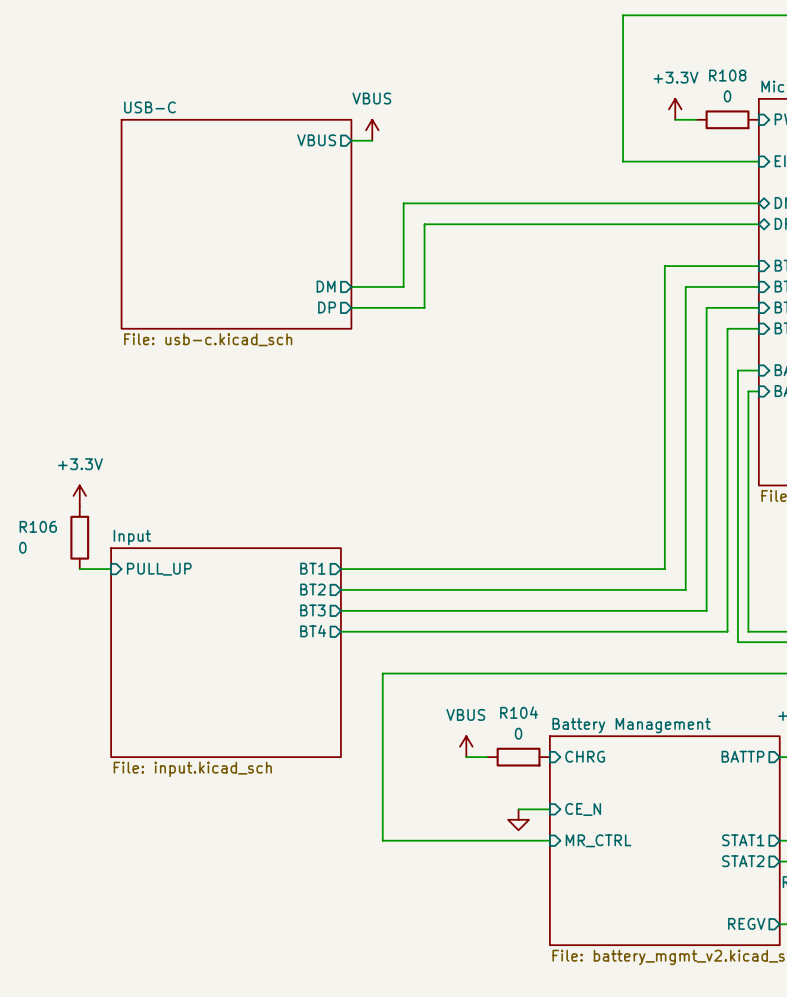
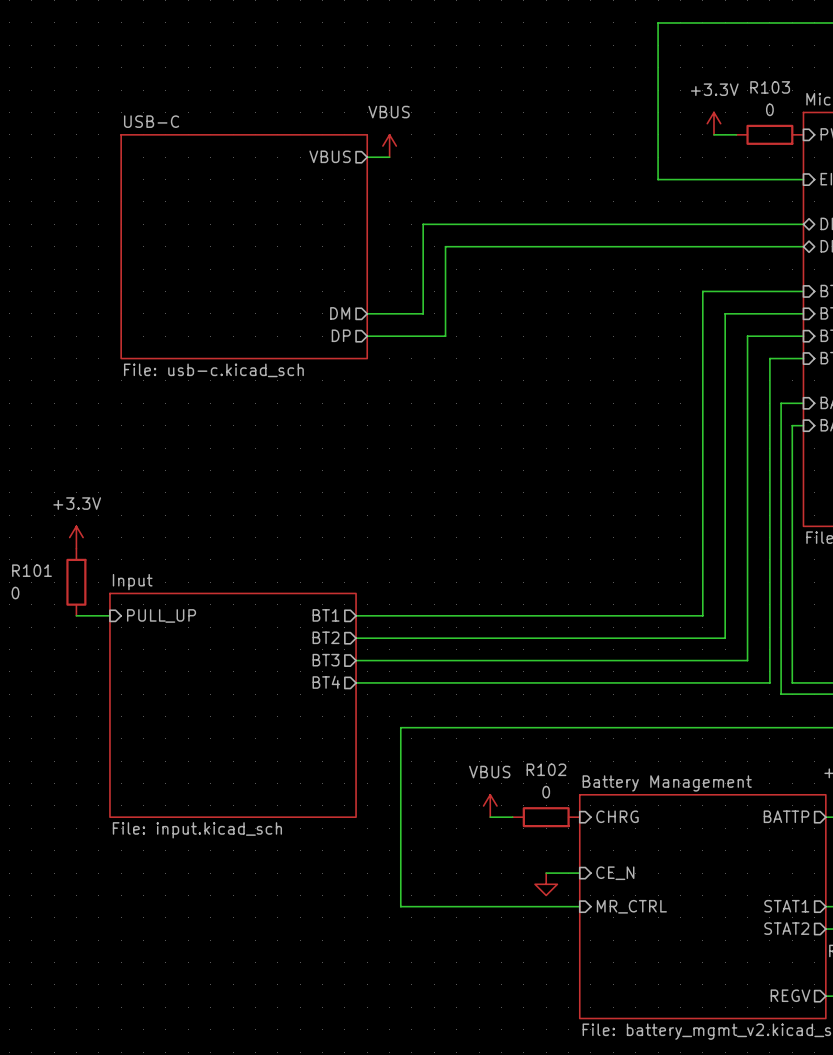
R108 name: R108 (727, 75) -> R103 (770, 87)
R106 name: R106 (38, 526) -> R101 (32, 570)
R104 name: R104 (519, 712) -> R102 (546, 769)

